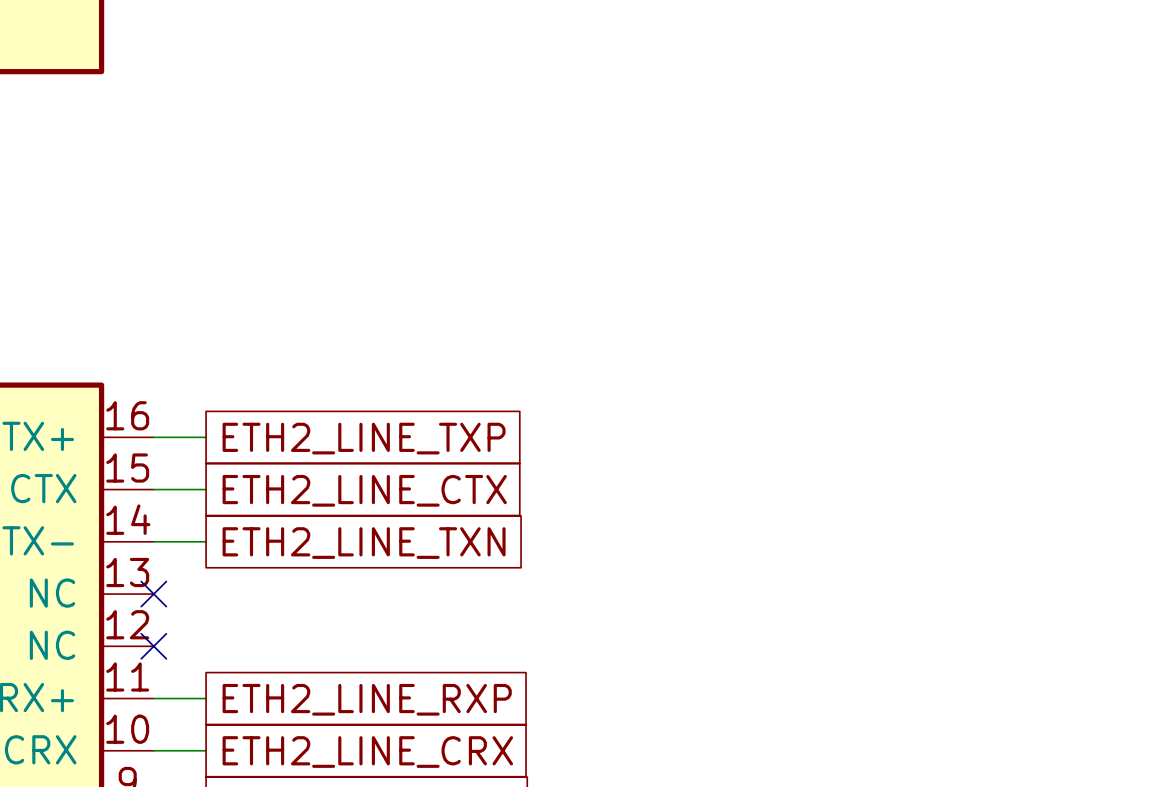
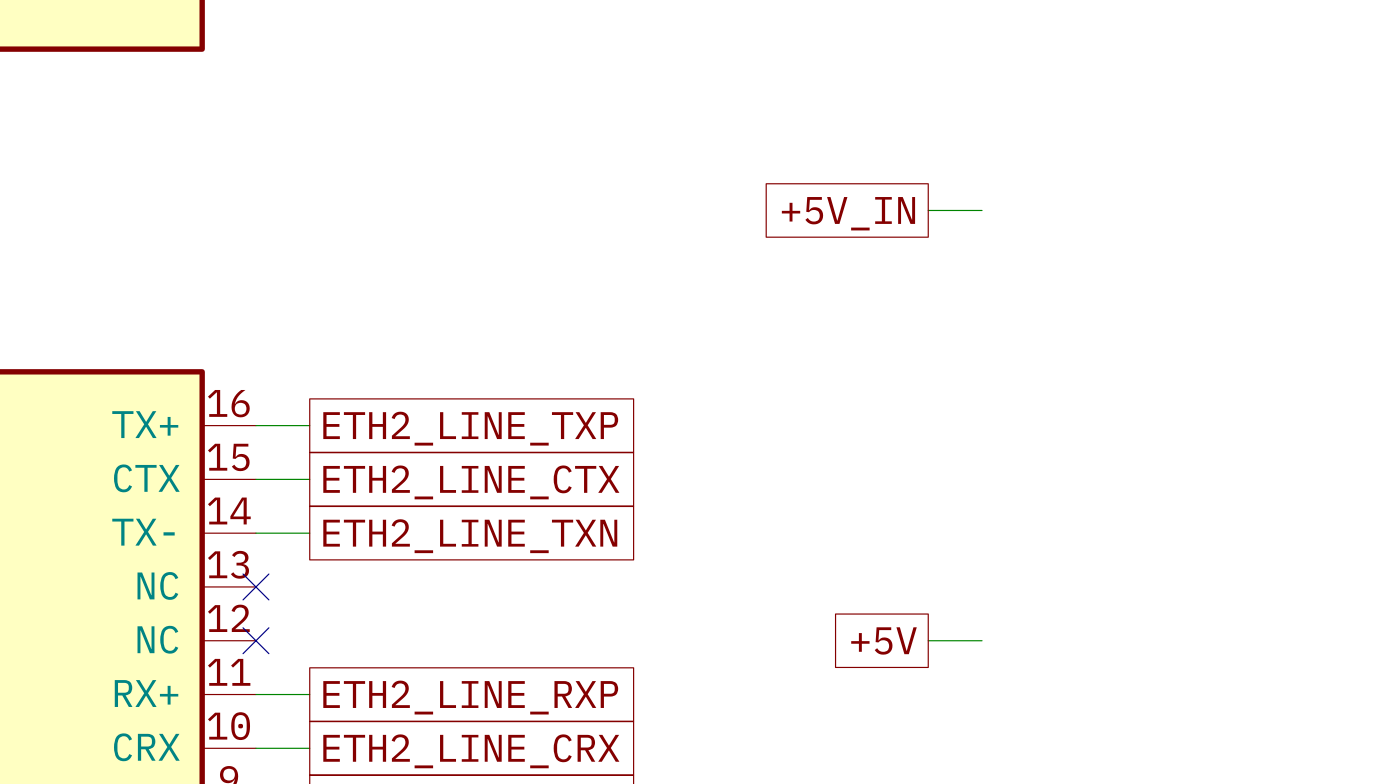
wire: none -> (928, 210) (982, 210)
global label: none -> +5V_IN (848, 213)
global label: none -> +5V (883, 640)
wire: none -> (928, 640) (982, 640)

